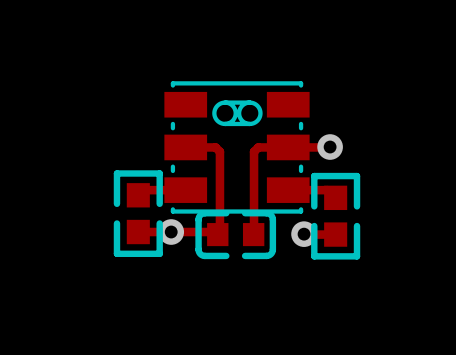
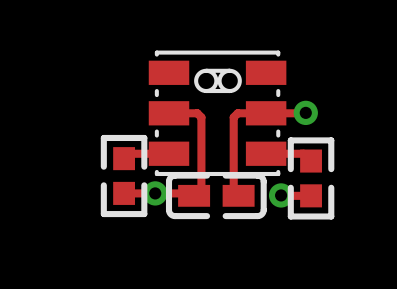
part footprint: [195, 210, 277, 260] -> [165, 172, 267, 220]

